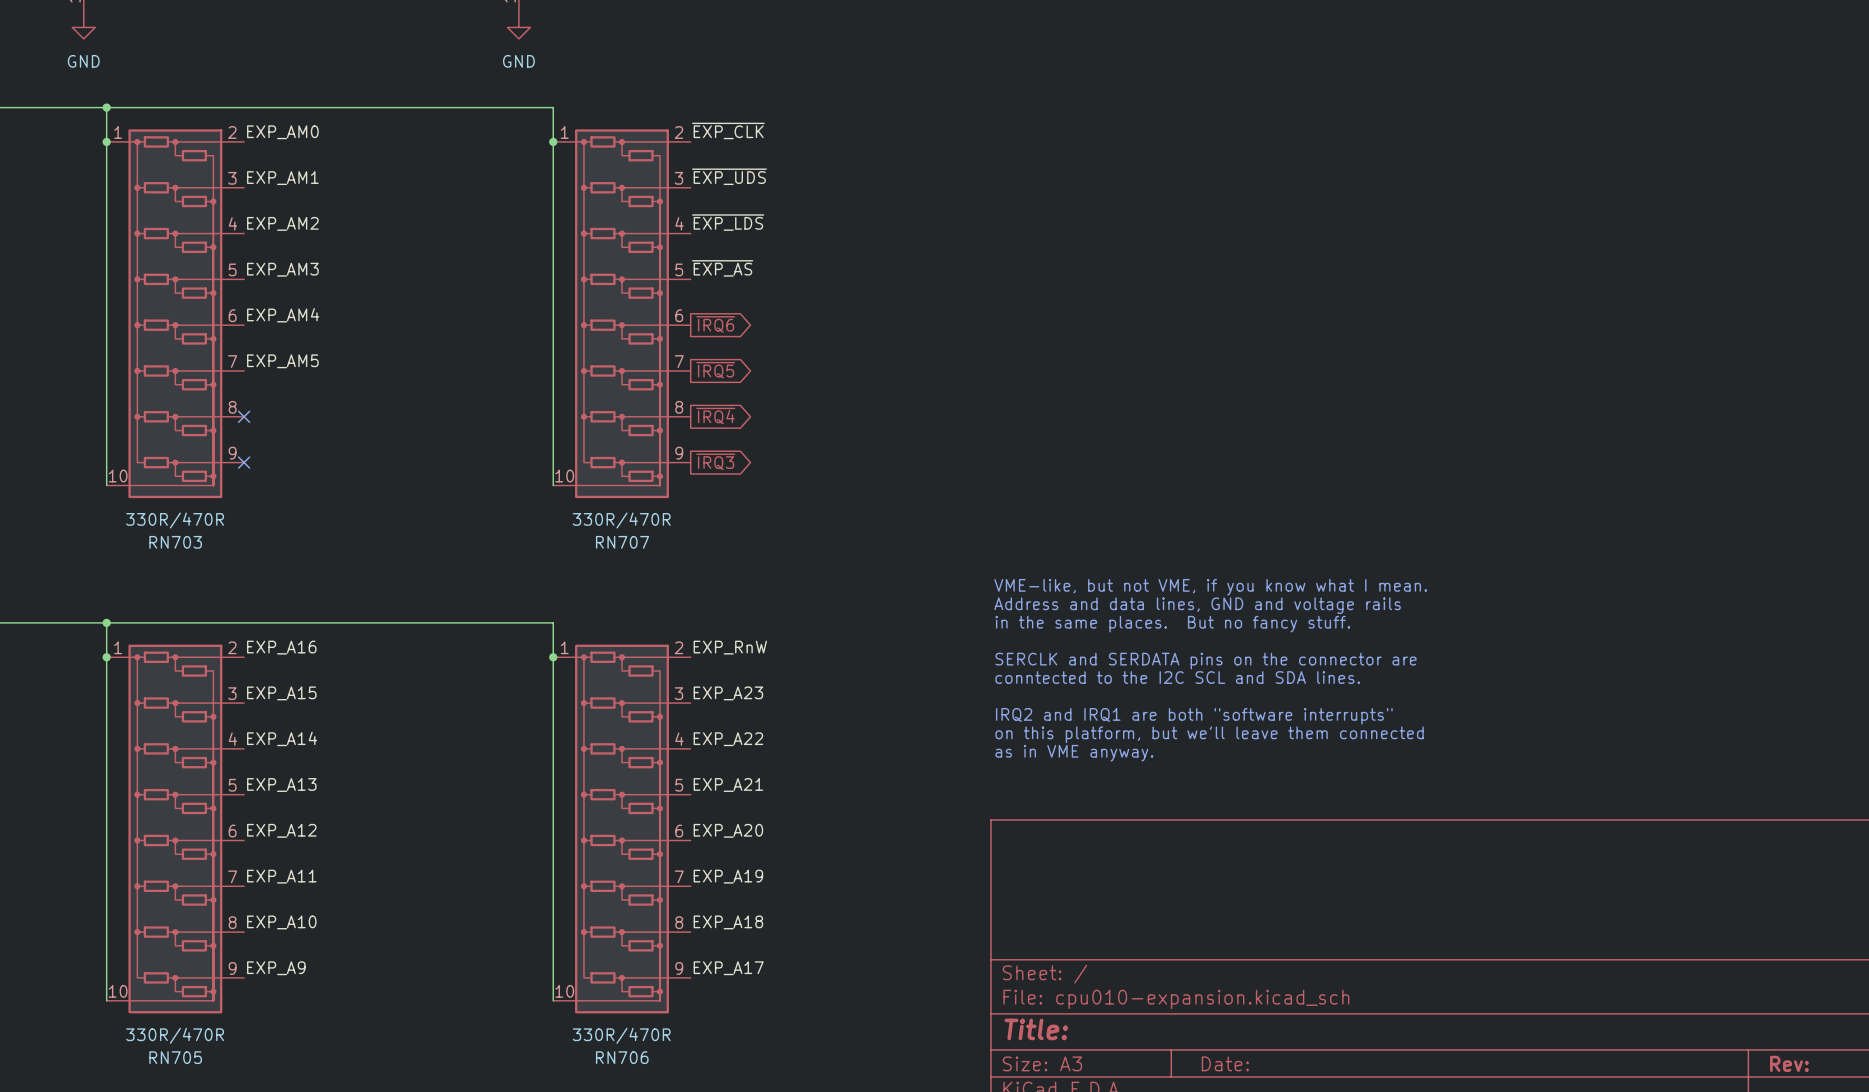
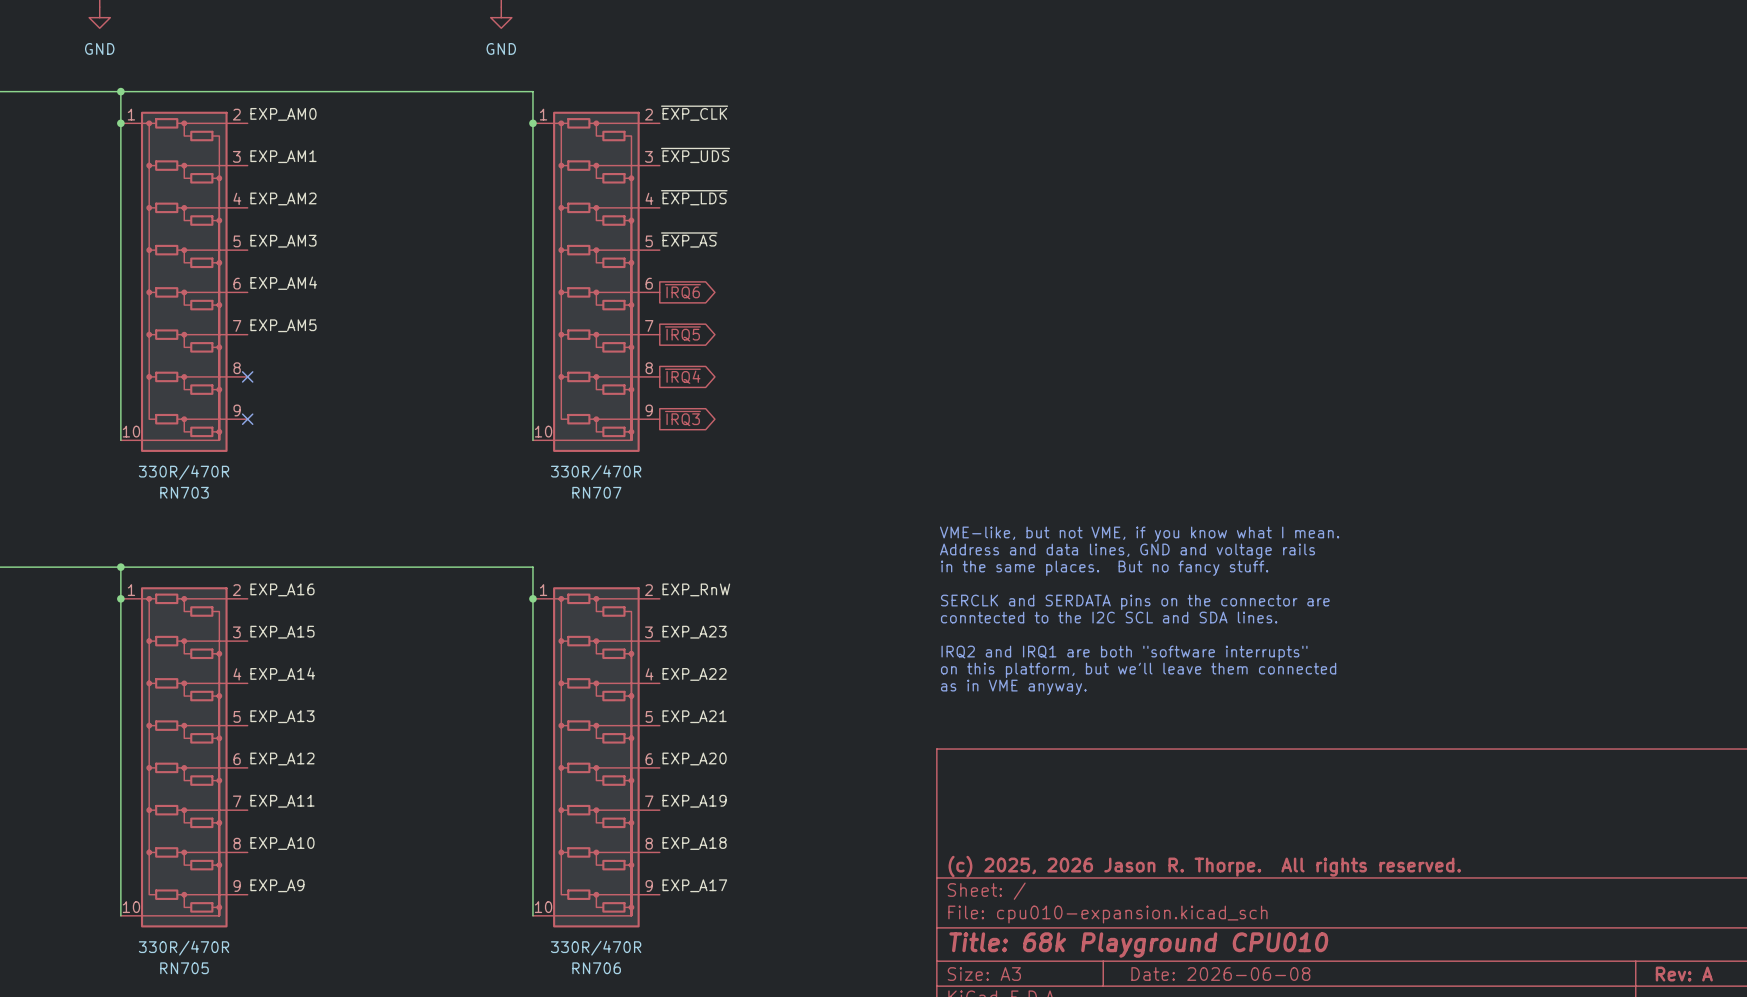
title block: none -> (c) 2025, 2026 Jason R. Thorpe. All rights reserved. (1204, 866)
title block: Title: (1036, 1029) -> Title: 68k Playground CPU010 (1138, 945)
title block: Date: (1225, 1063) -> Date: 2026-06-08 (1220, 974)
title block: Rev: (1789, 1063) -> Rev: A (1684, 974)

